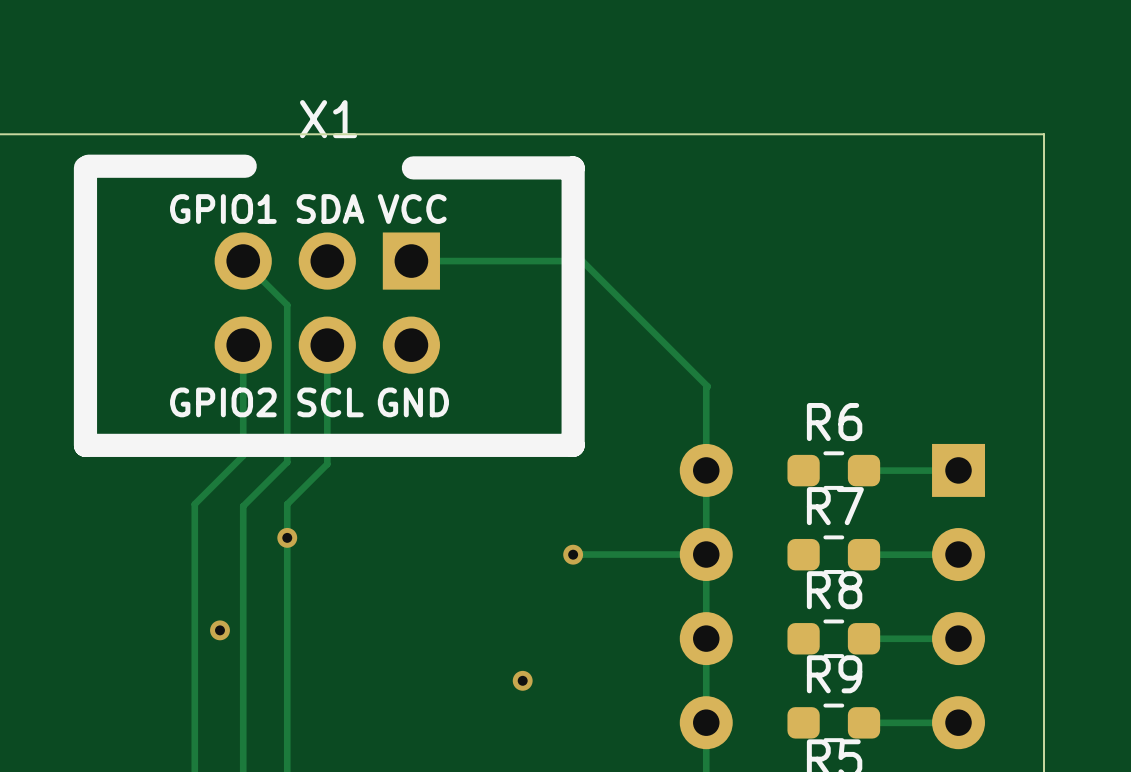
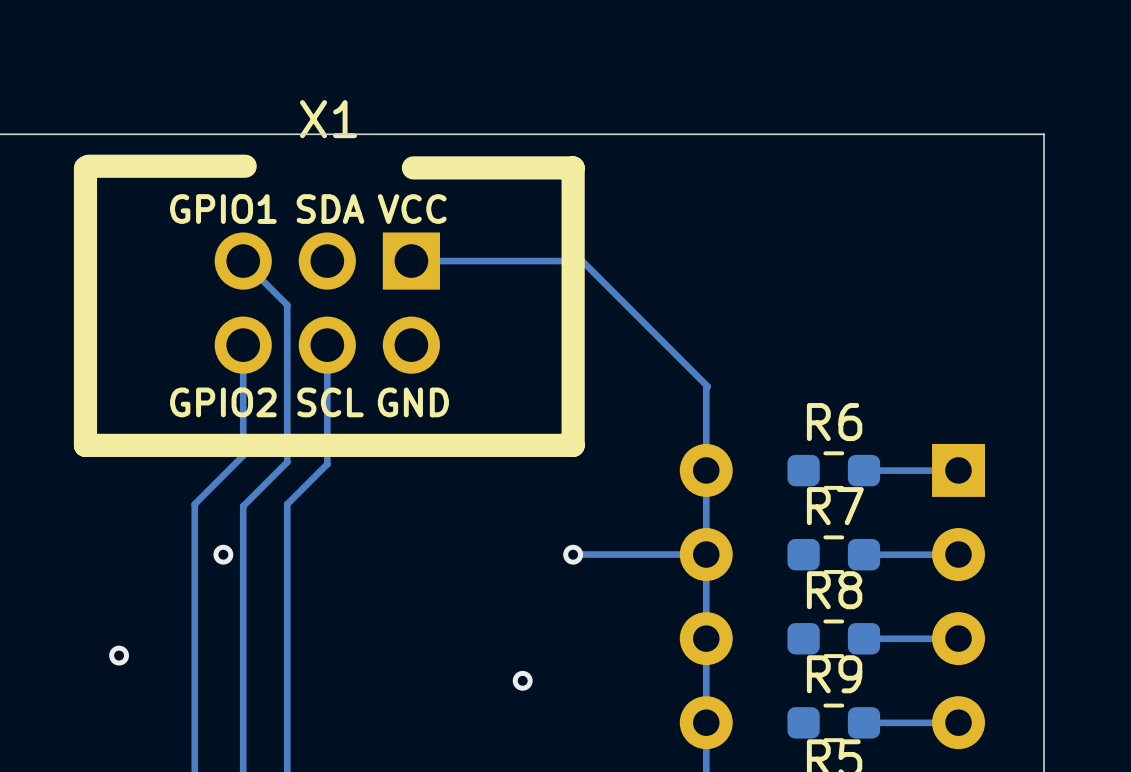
via: (287, 537) -> none
via: none -> (223, 554)
via: (219, 630) -> none
via: none -> (119, 655)

